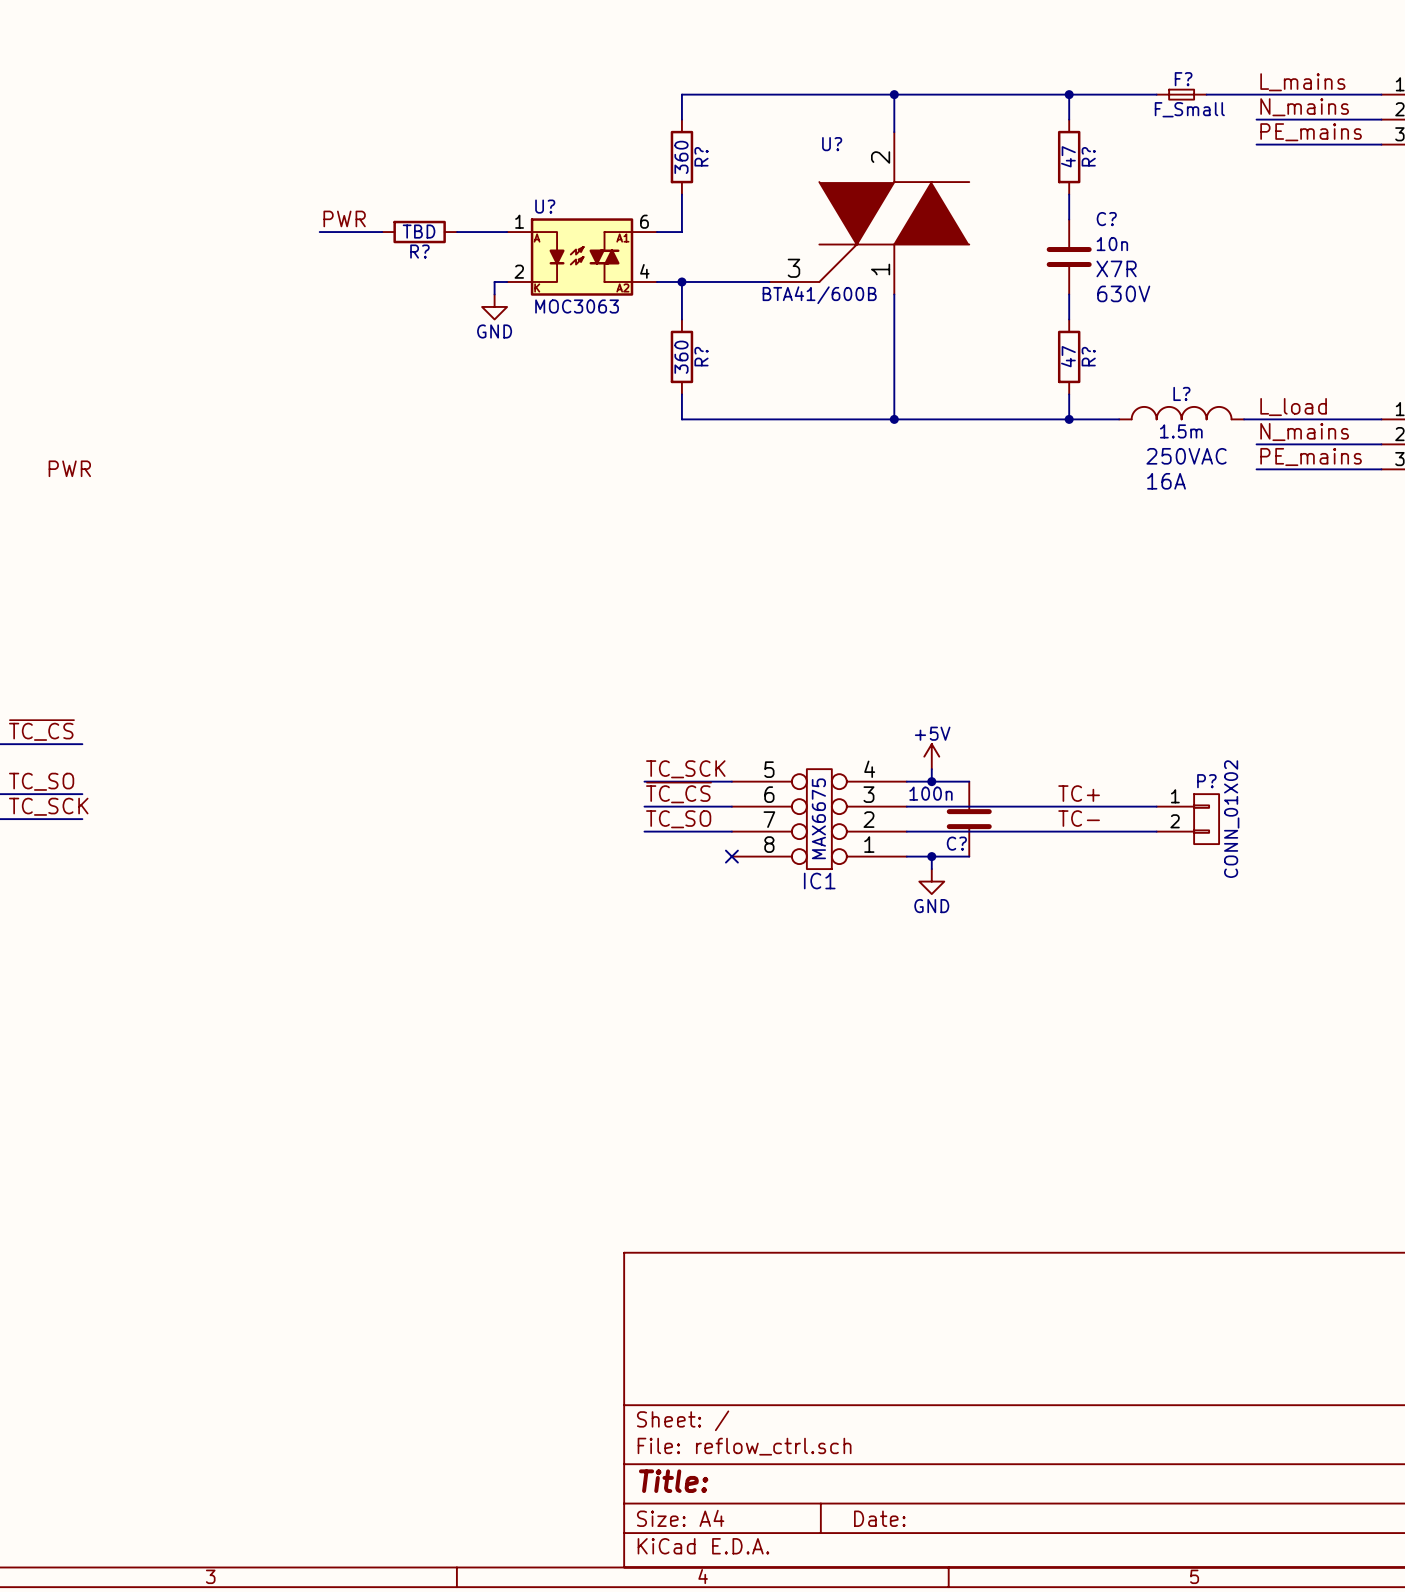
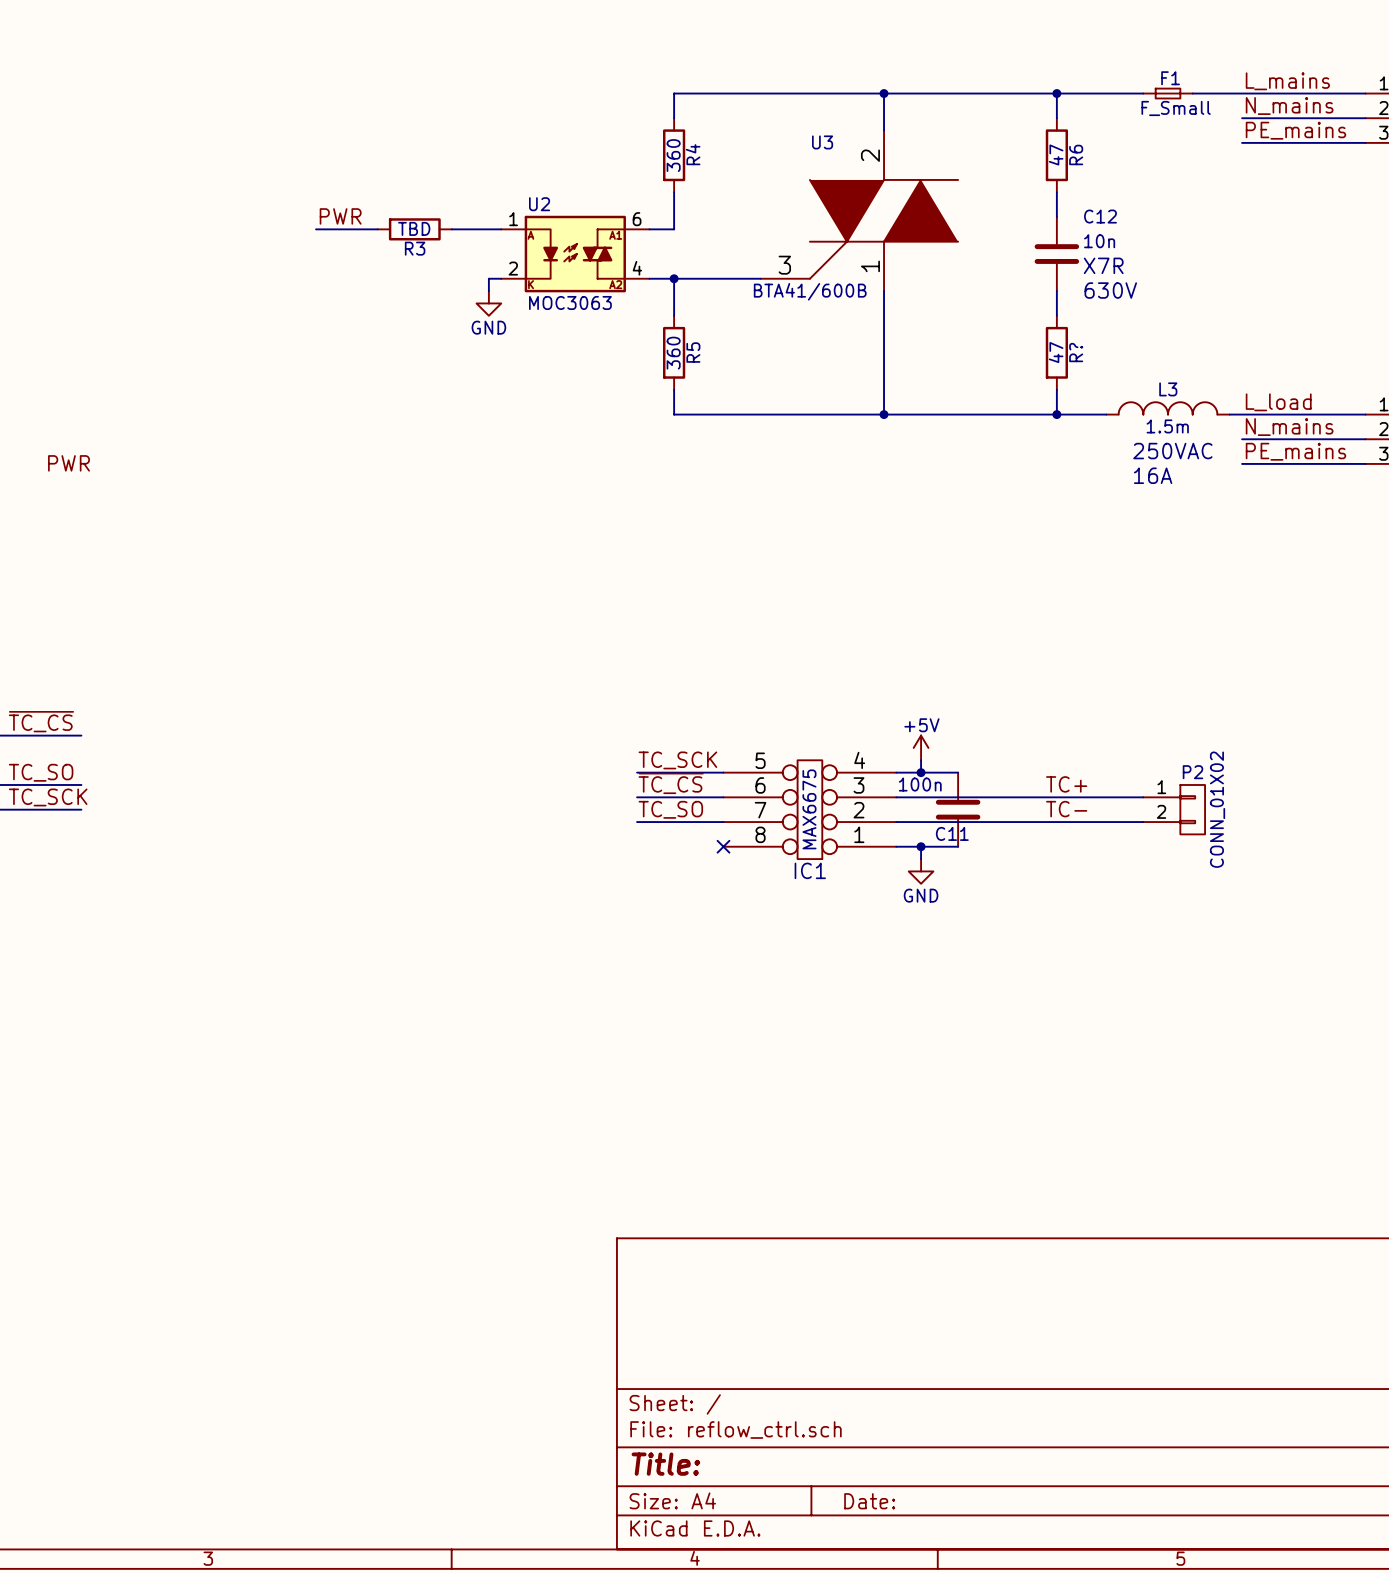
F? name: F? (1183, 79) -> F1 (1170, 78)
U? name: U? (832, 144) -> U3 (822, 142)
R? name: R? (701, 156) -> R4 (693, 154)
R? name: R? (1088, 156) -> R6 (1076, 154)
U? name: U? (545, 206) -> U2 (539, 204)
C? name: C? (1106, 219) -> C12 (1100, 216)
R? name: R? (419, 251) -> R3 (415, 248)
R? name: R? (701, 356) -> R5 (693, 352)
L? name: L? (1181, 393) -> L3 (1168, 389)
P? name: P? (1206, 781) -> P2 (1193, 772)
C? name: C? (956, 843) -> C11 (952, 833)

